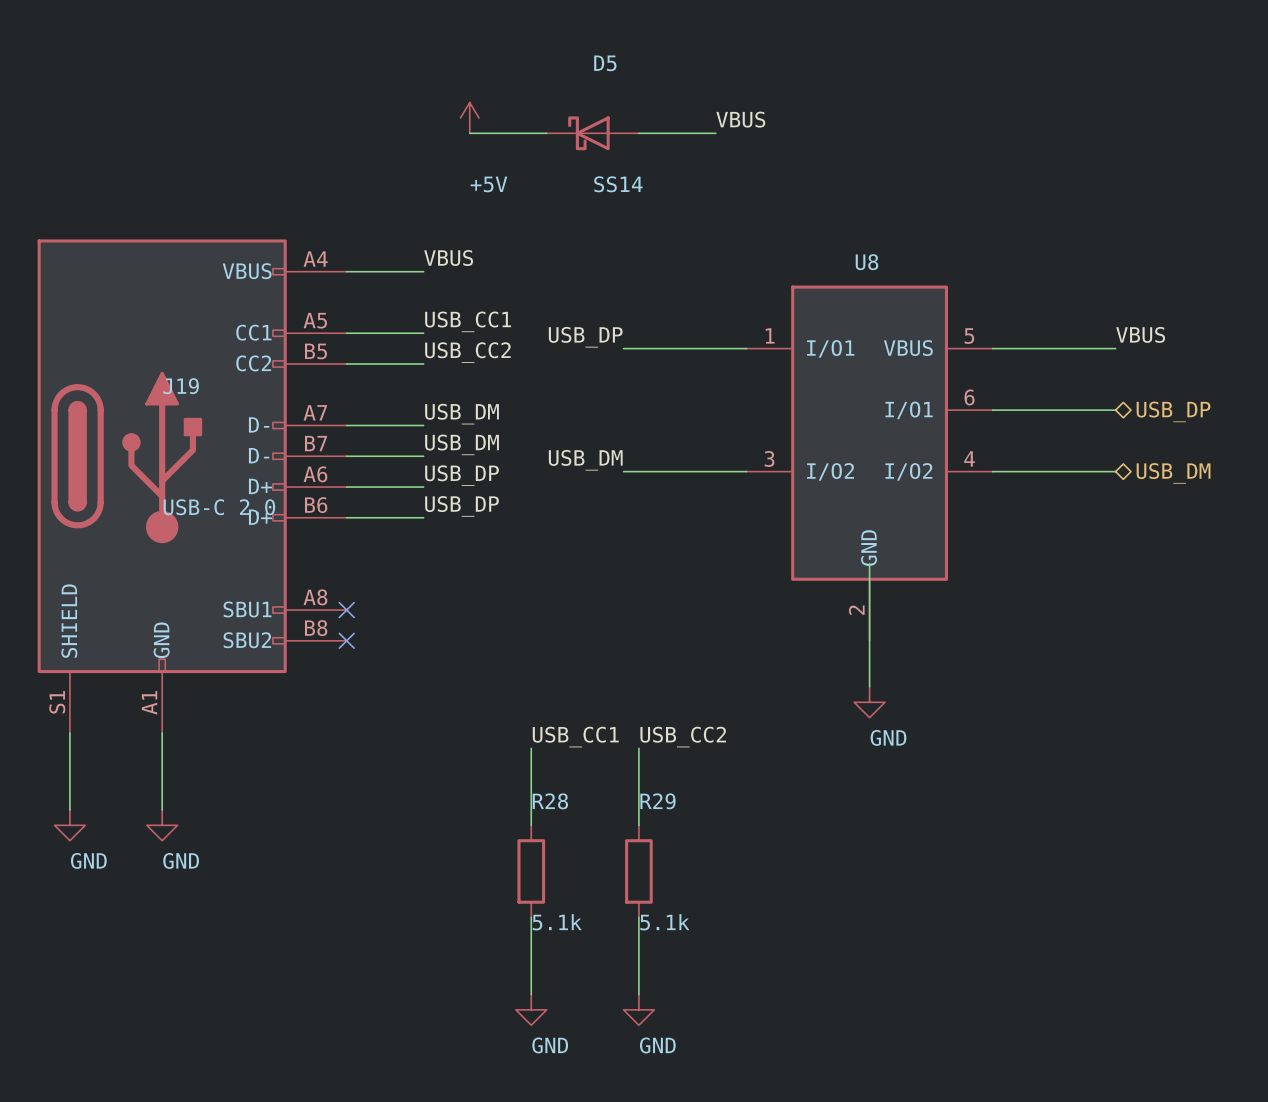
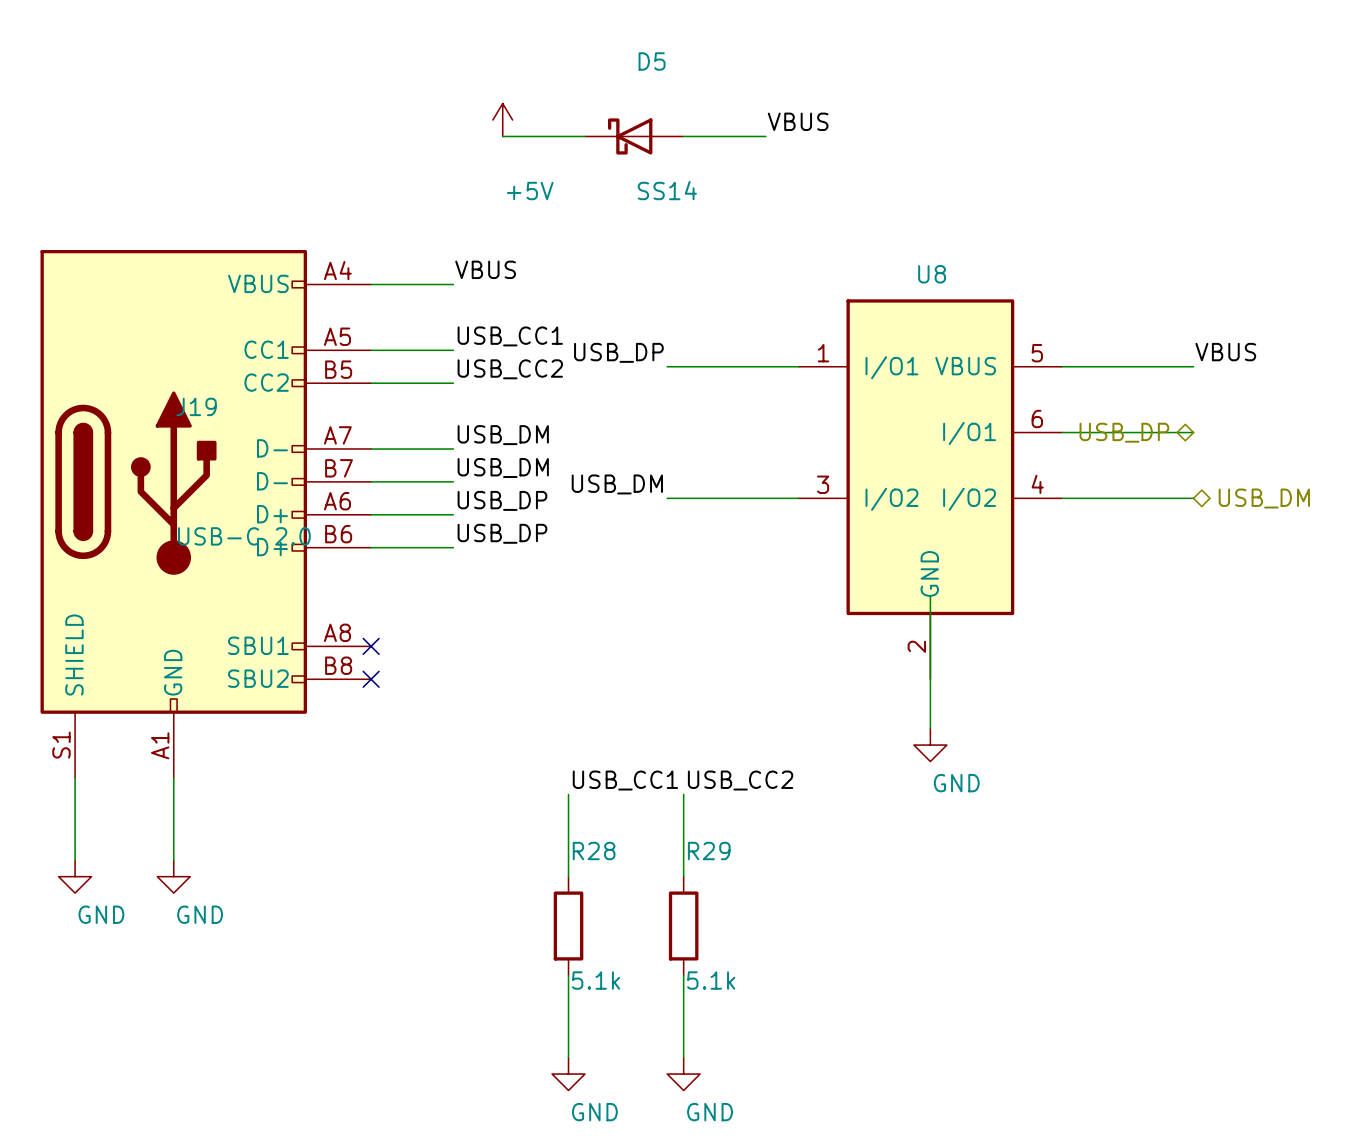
hierarchical label rotation: 0° (1173, 411) -> 180° (1124, 432)
hierarchical label position: USB_DP (1173, 411) -> USB_DP (1124, 432)

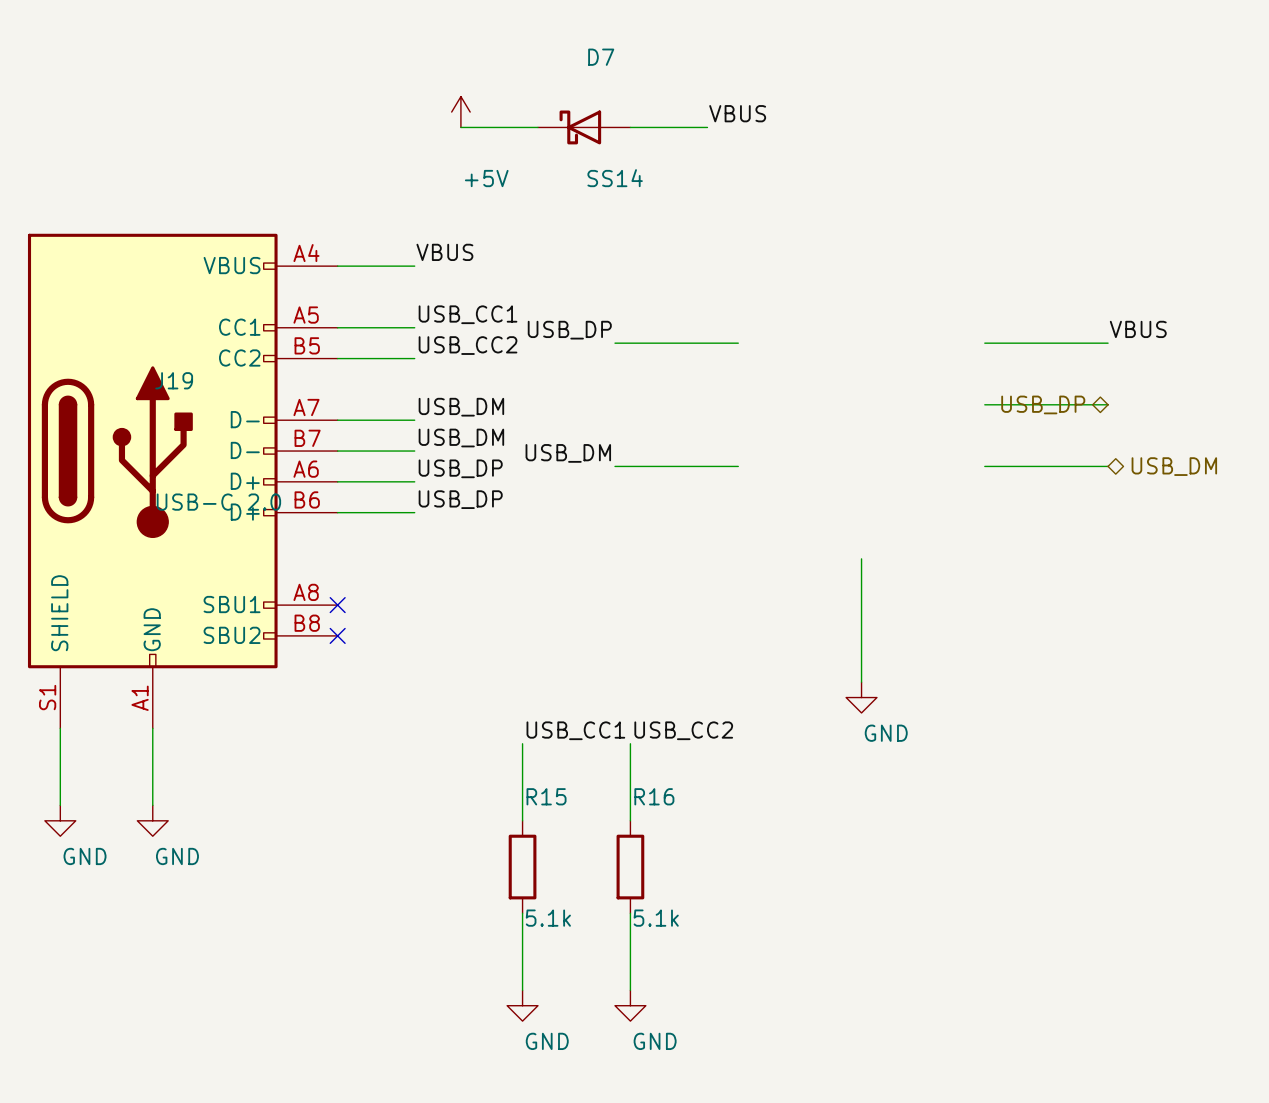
D5 name: D5 (652, 61) -> D7 (601, 57)
U8: (930, 489) -> none
R28 name: R28 (594, 851) -> R15 (546, 796)
R29 name: R29 (709, 851) -> R16 (654, 796)

